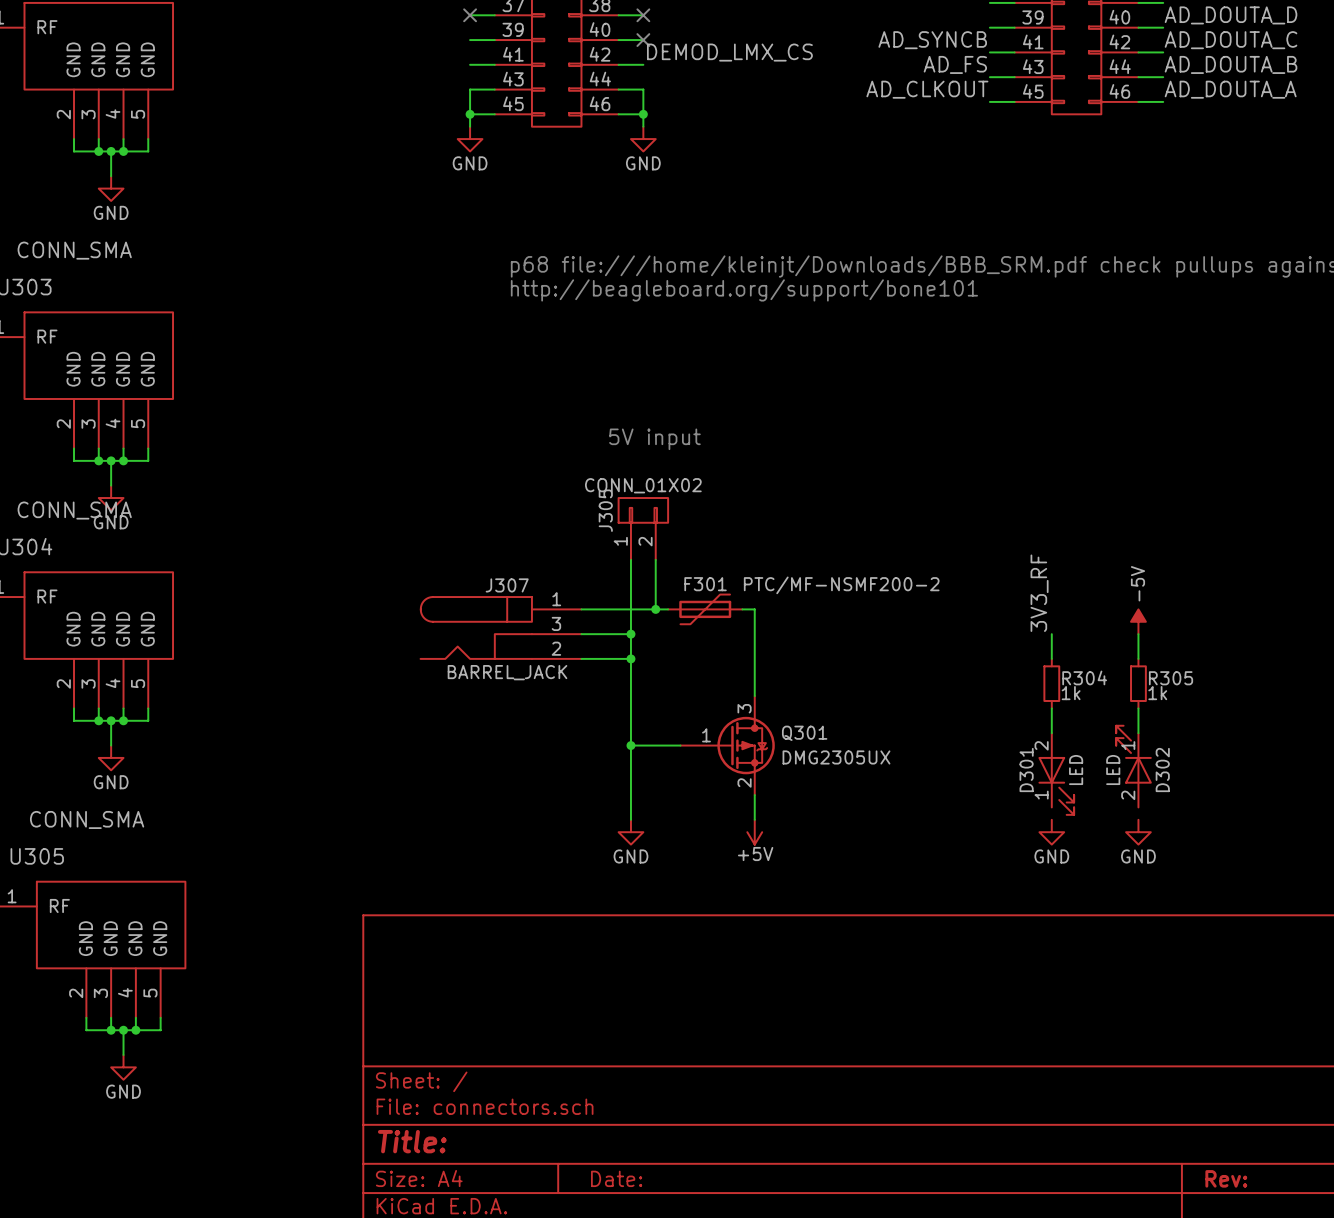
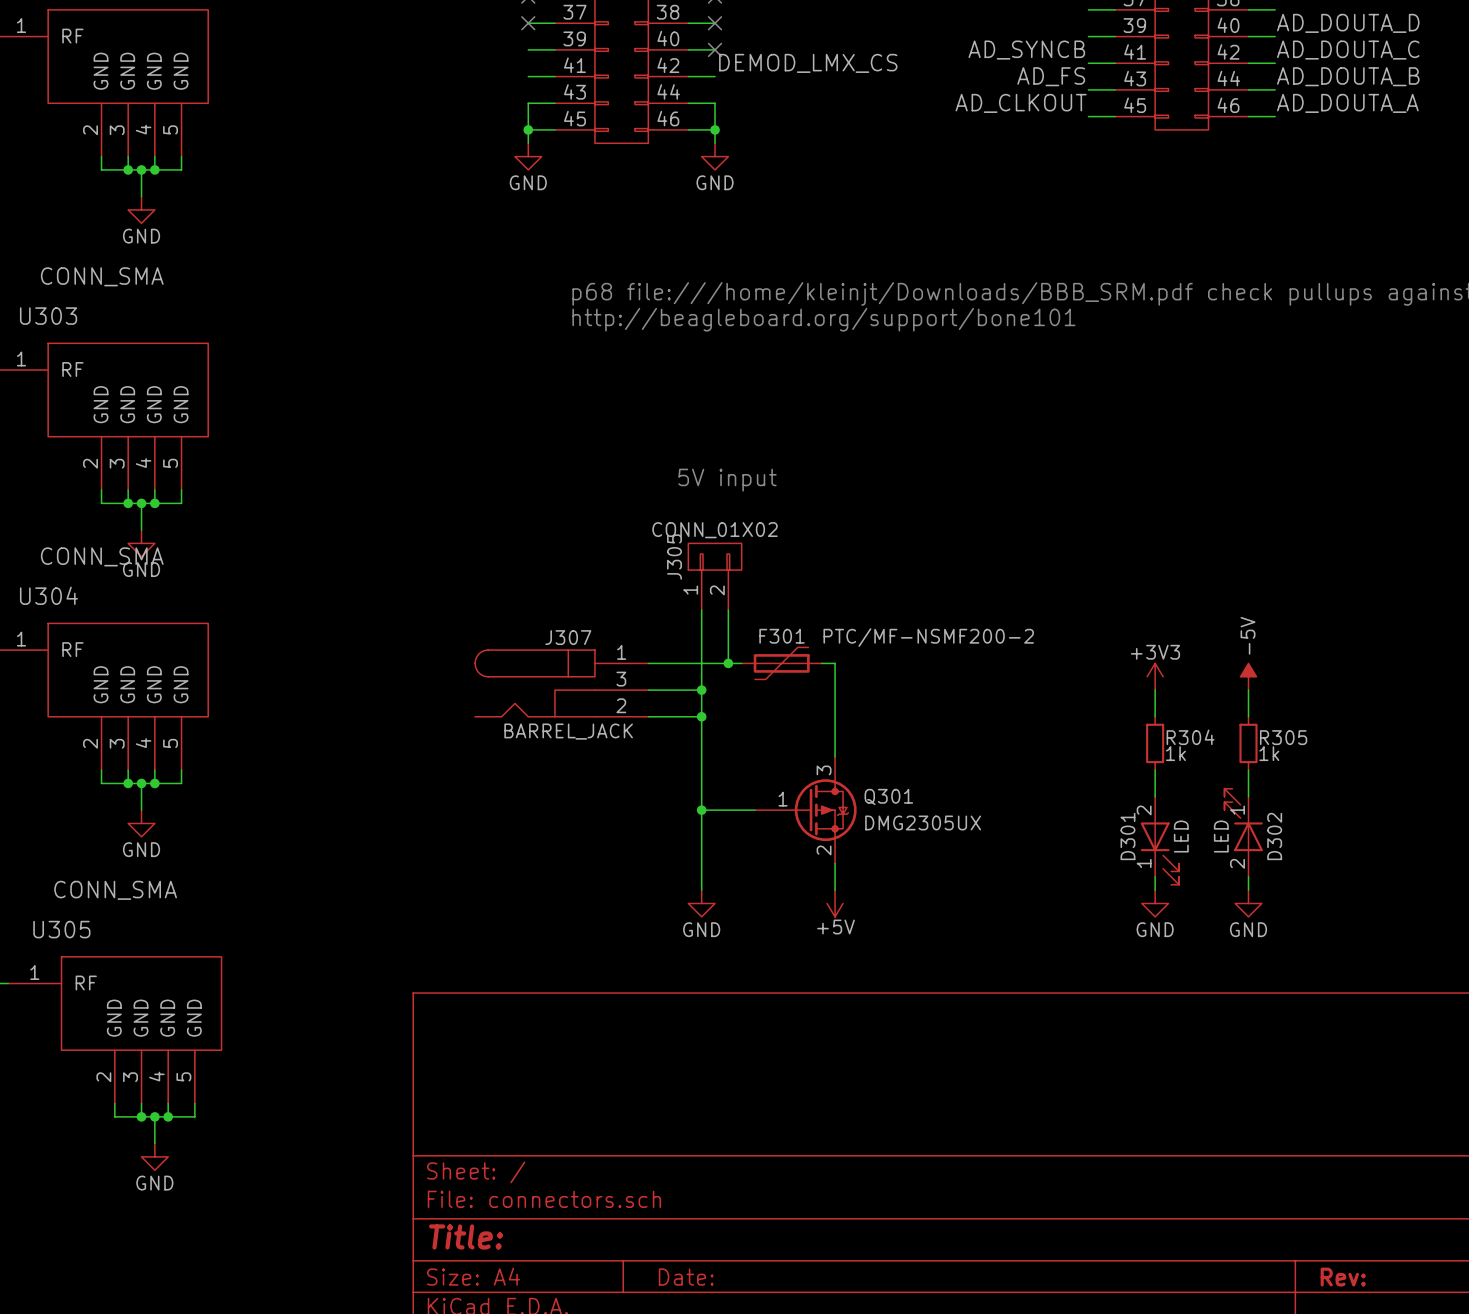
label: 3V3_RF (1039, 593) -> none
power symbol: none -> +3V3 (1155, 676)
wire: none -> (1155, 876) (1155, 890)
wire: none -> (1248, 876) (1248, 890)

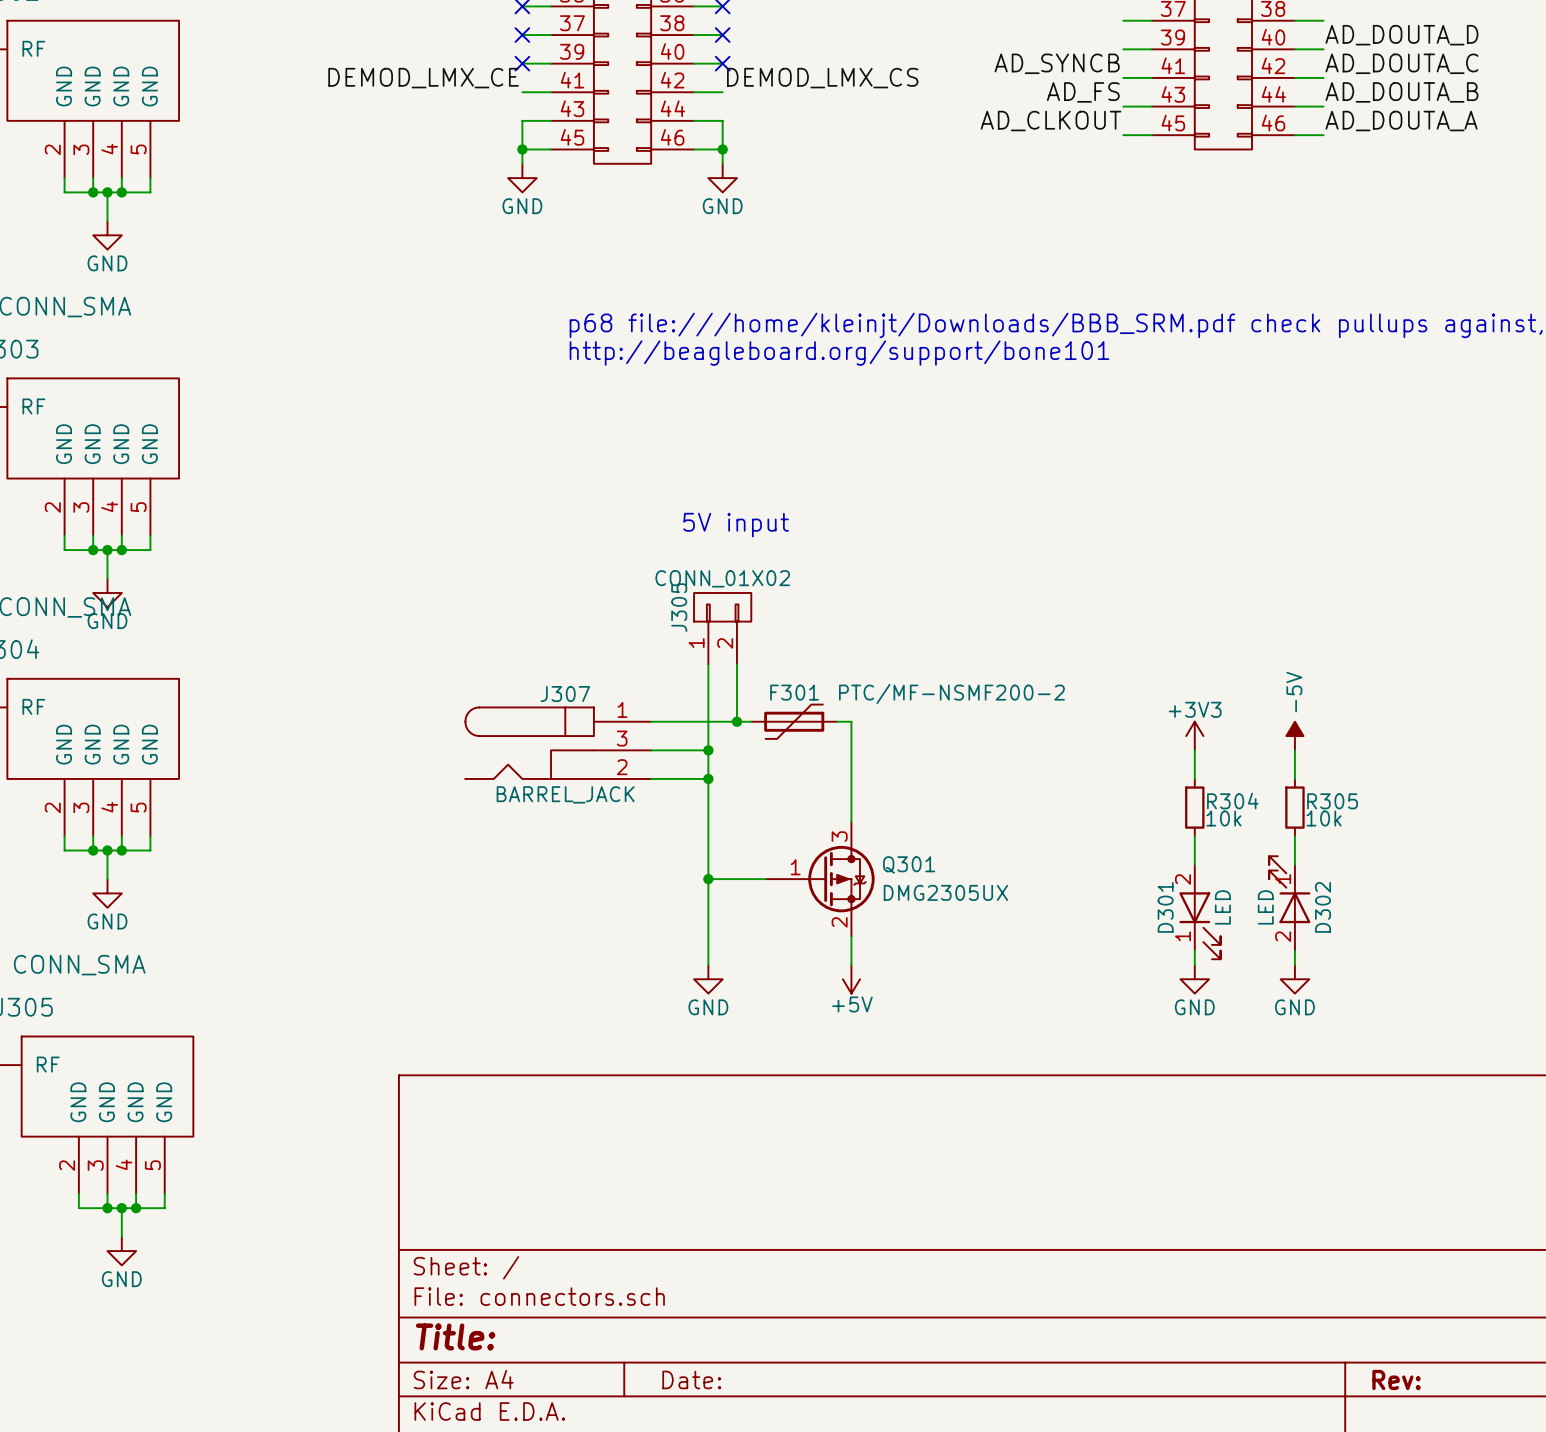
no-connect mark: none -> (522, 63)
label: none -> DEMOD_LMX_CE (423, 78)
R304 value: 1k (1175, 753) -> 10k (1223, 818)
R305 value: 1k (1269, 753) -> 10k (1324, 818)

